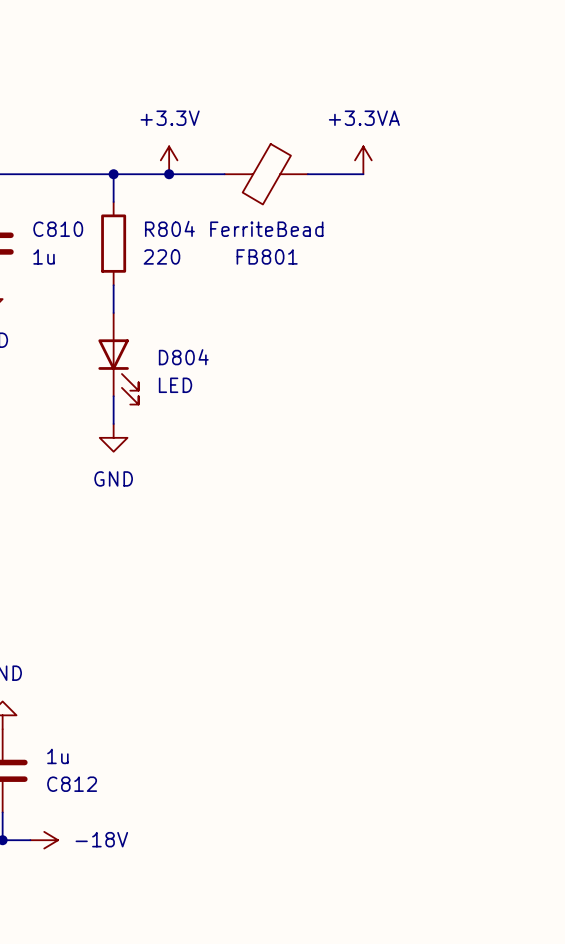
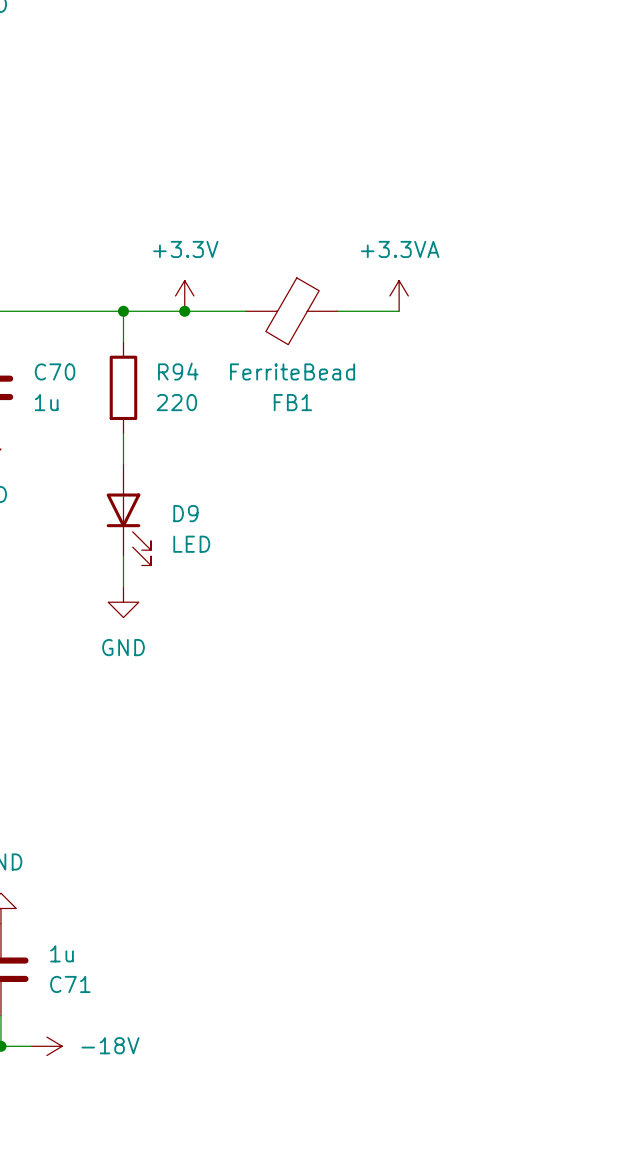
R804 name: R804 (169, 228) -> R94 (178, 371)
C810 name: C810 (58, 229) -> C70 (55, 371)
FB801 name: FB801 (267, 256) -> FB1 (292, 402)
D804 name: D804 (183, 357) -> D9 (185, 513)
C812 name: C812 (72, 784) -> C71 (70, 984)

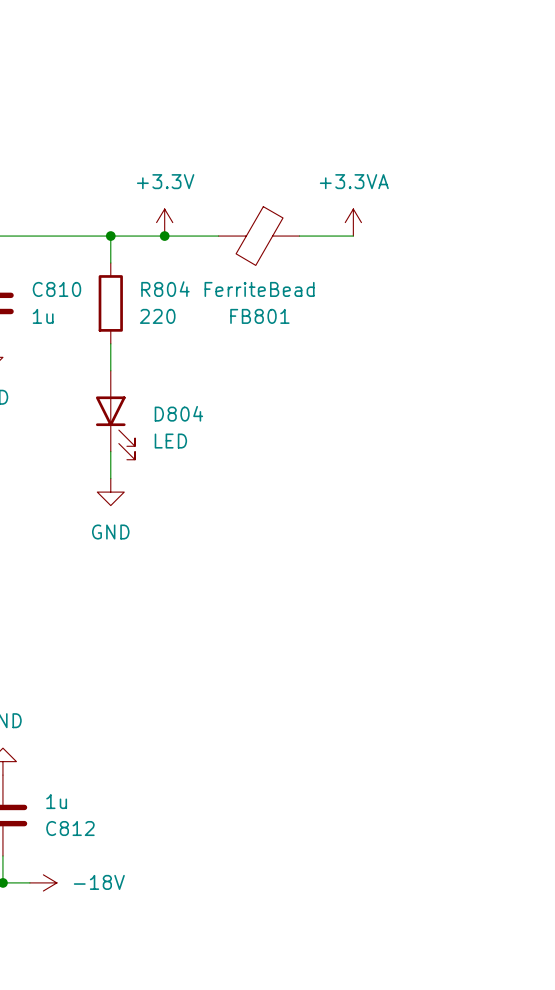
C70 name: C70 (55, 371) -> C810 (56, 289)
R94 name: R94 (178, 371) -> R804 (165, 289)
FB1 name: FB1 (292, 402) -> FB801 (259, 316)
D9 name: D9 (185, 513) -> D804 (178, 413)
C71 name: C71 (70, 984) -> C812 (70, 828)

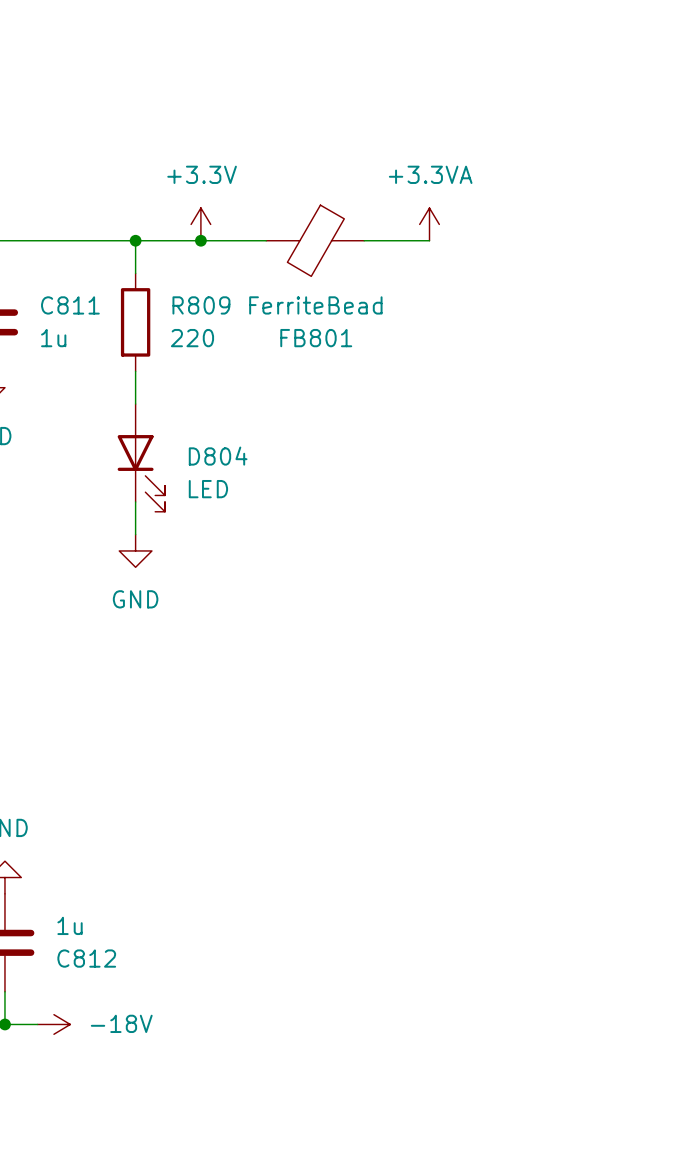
C810 name: C810 (56, 289) -> C811 (70, 305)
R804 name: R804 (165, 289) -> R809 (201, 305)

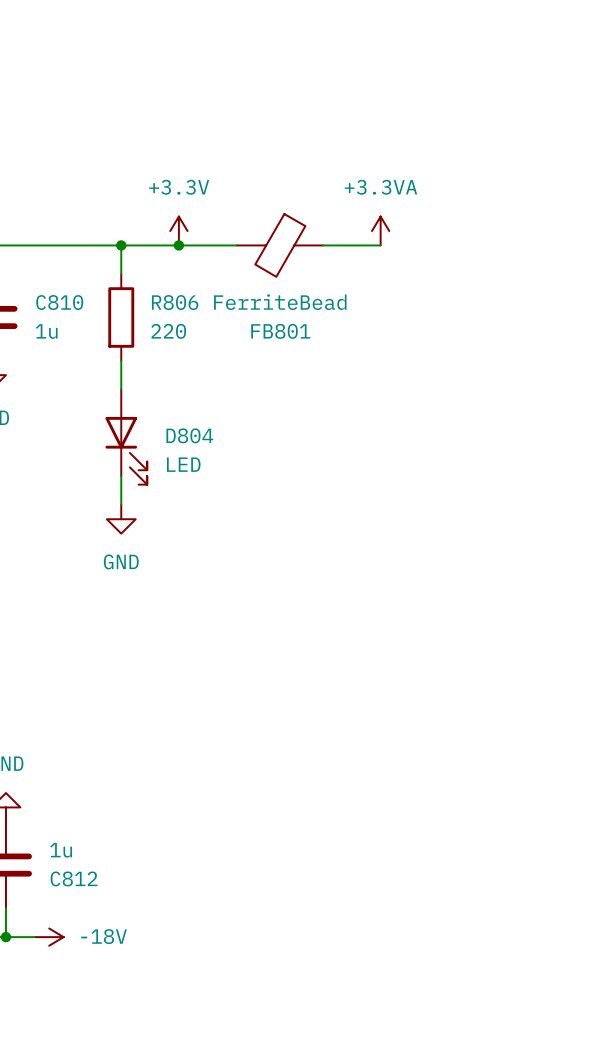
C811 name: C811 (70, 305) -> C810 (59, 302)
R809 name: R809 (201, 305) -> R806 (175, 302)

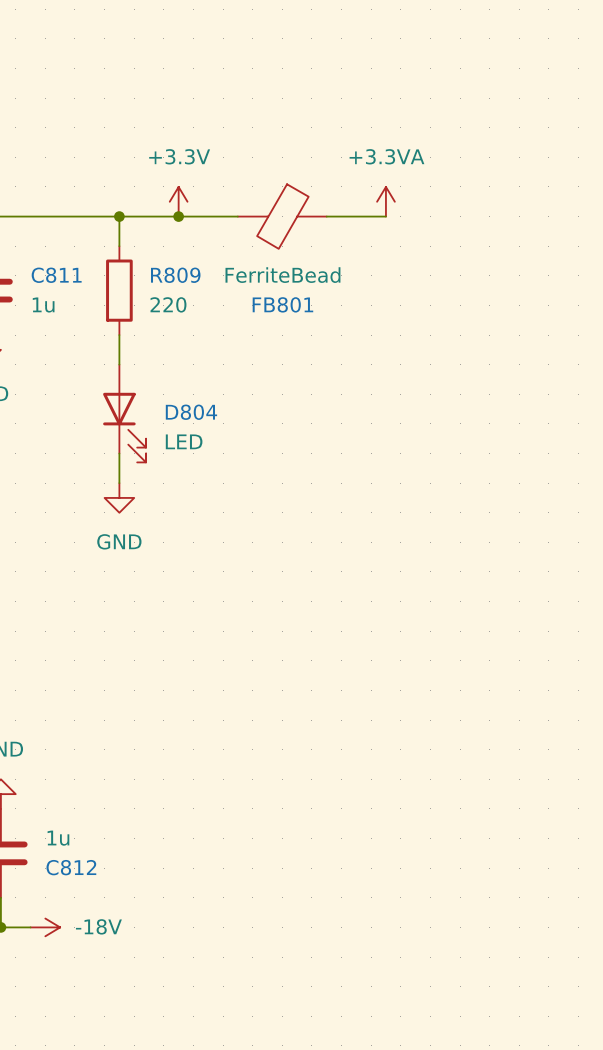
C810 name: C810 (59, 302) -> C811 (56, 275)
R806 name: R806 (175, 302) -> R809 (175, 275)

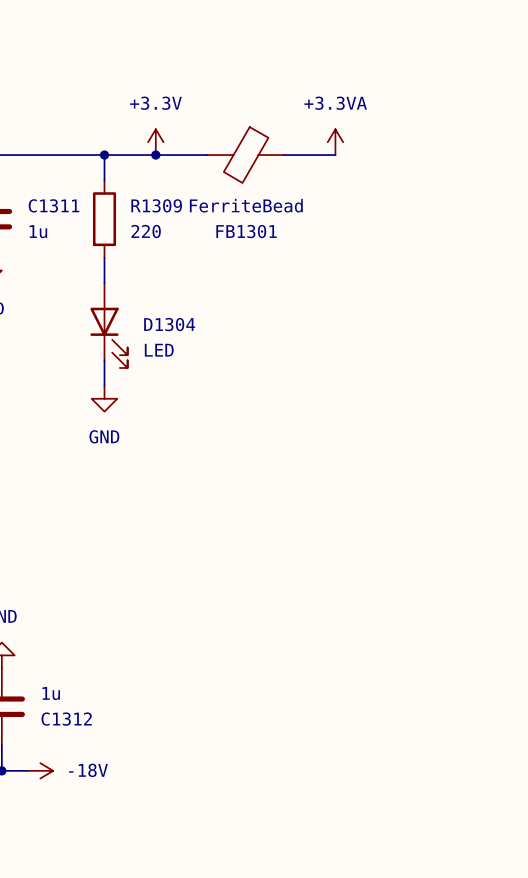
C811 name: C811 (56, 275) -> C1311 (54, 205)
R809 name: R809 (175, 275) -> R1309 (156, 205)
FB801 name: FB801 (282, 304) -> FB1301 (246, 231)
D804 name: D804 (191, 412) -> D1304 (169, 324)
C812 name: C812 (71, 867) -> C1312 (66, 719)

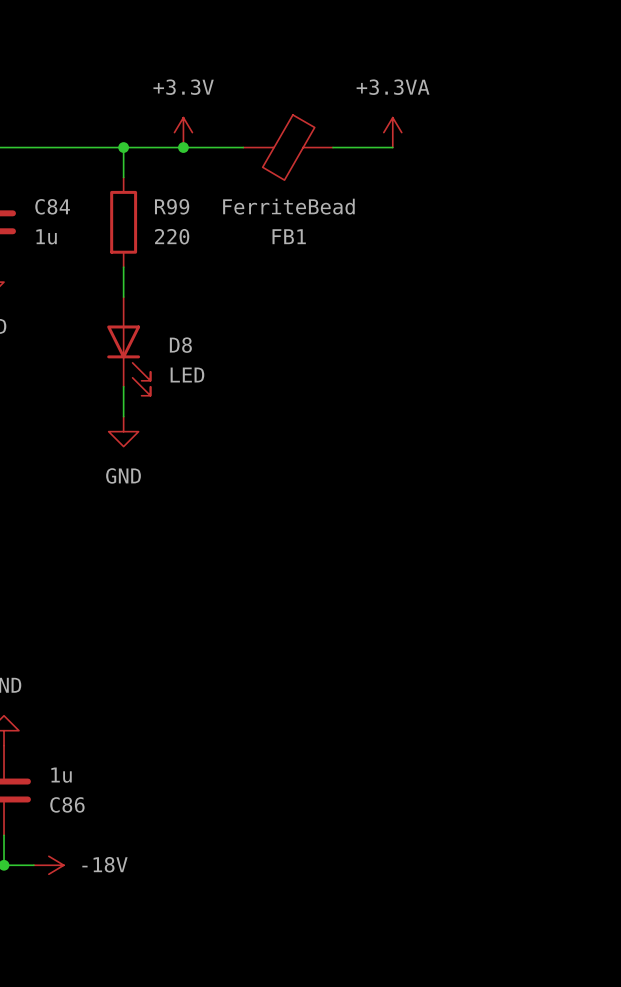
C1311 name: C1311 (54, 205) -> C84 (52, 206)
R1309 name: R1309 (156, 205) -> R99 (172, 206)
FB1301 name: FB1301 (246, 231) -> FB1 (289, 236)
D1304 name: D1304 (169, 324) -> D8 (180, 345)
C1312 name: C1312 (66, 719) -> C86 (67, 804)

